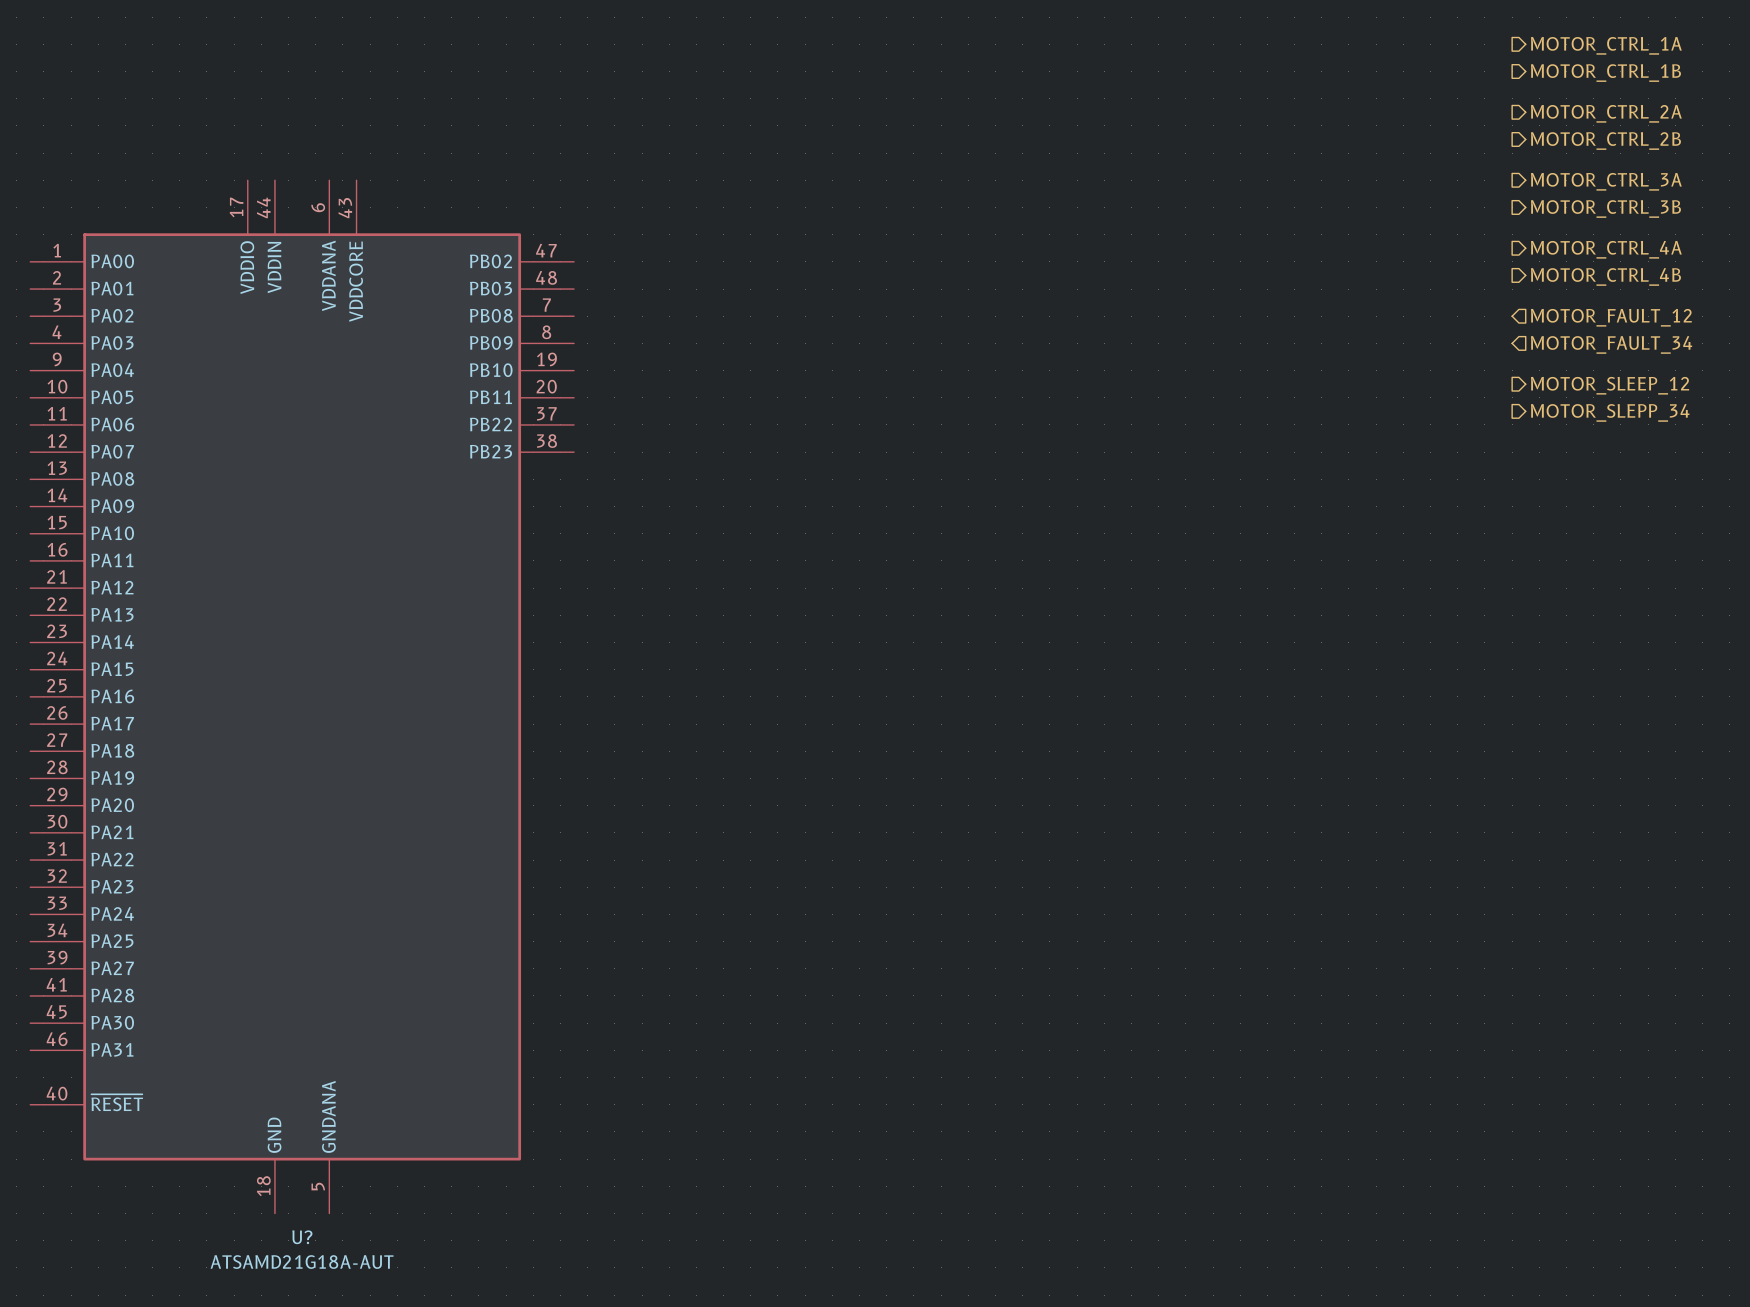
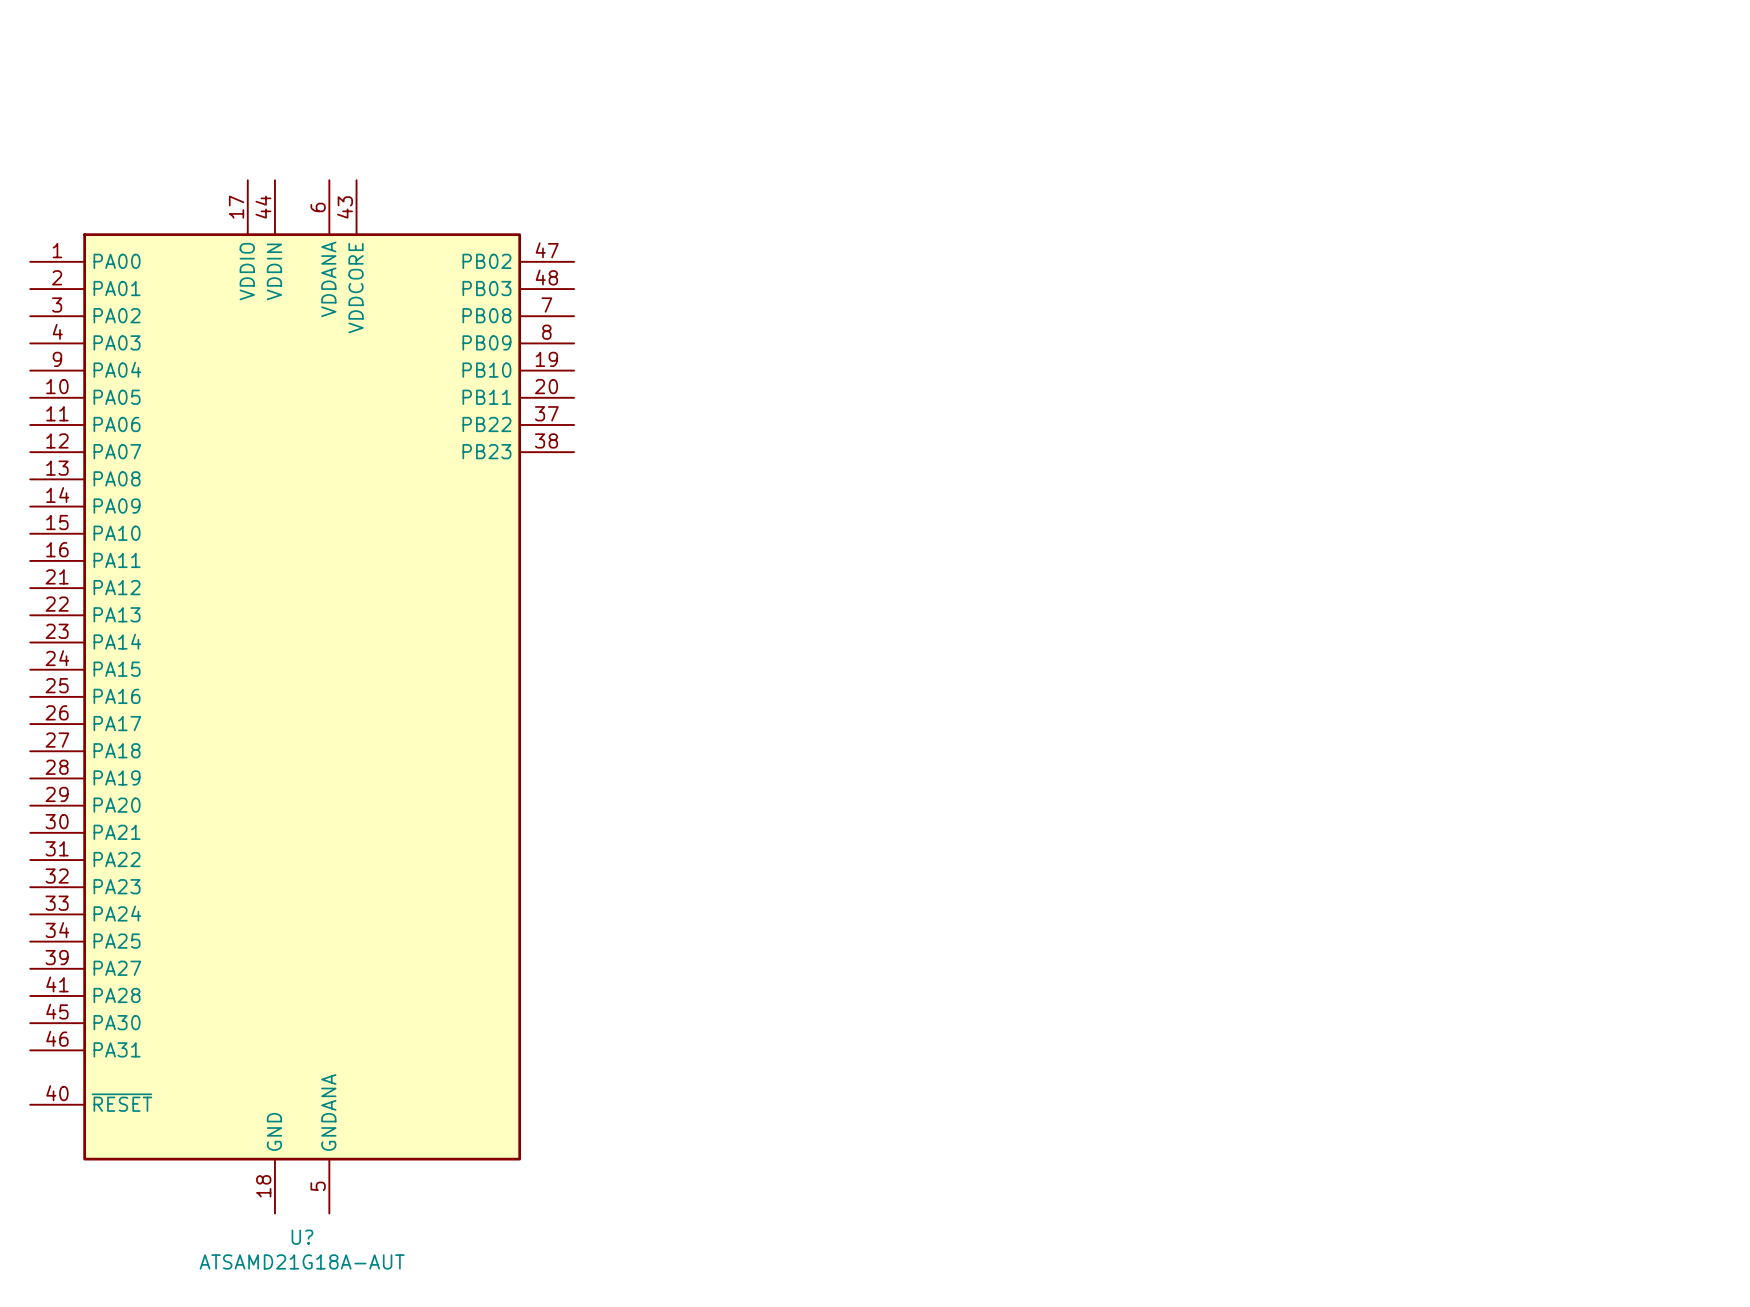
hierarchical label: MOTOR_CTRL_1A (1606, 45) -> none
hierarchical label: MOTOR_CTRL_1B (1605, 73) -> none
hierarchical label: MOTOR_CTRL_2A (1606, 113) -> none
hierarchical label: MOTOR_CTRL_2B (1605, 141) -> none
hierarchical label: MOTOR_CTRL_3A (1606, 181) -> none
hierarchical label: MOTOR_CTRL_3B (1605, 208) -> none
hierarchical label: MOTOR_CTRL_4A (1606, 249) -> none
hierarchical label: MOTOR_CTRL_4B (1605, 276) -> none
hierarchical label: MOTOR_FAULT_12 (1611, 317) -> none
hierarchical label: MOTOR_FAULT_34 (1611, 344) -> none
hierarchical label: MOTOR_SLEEP_12 (1610, 385) -> none
hierarchical label: MOTOR_SLEPP_34 (1610, 412) -> none

